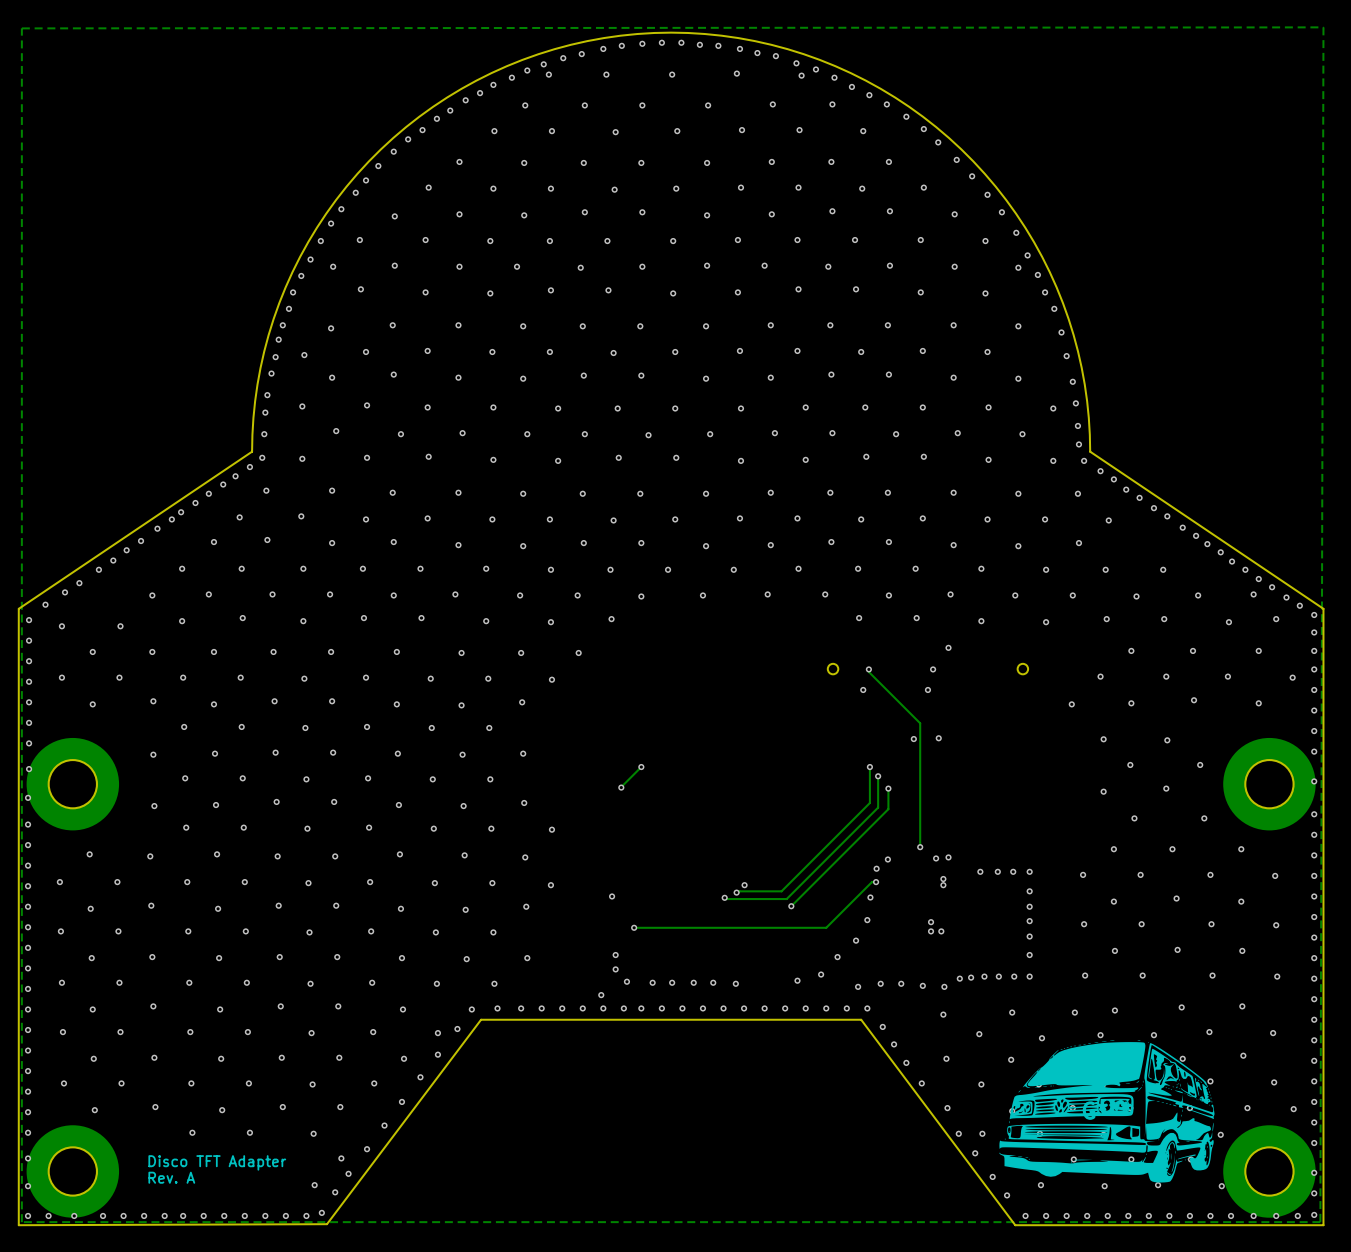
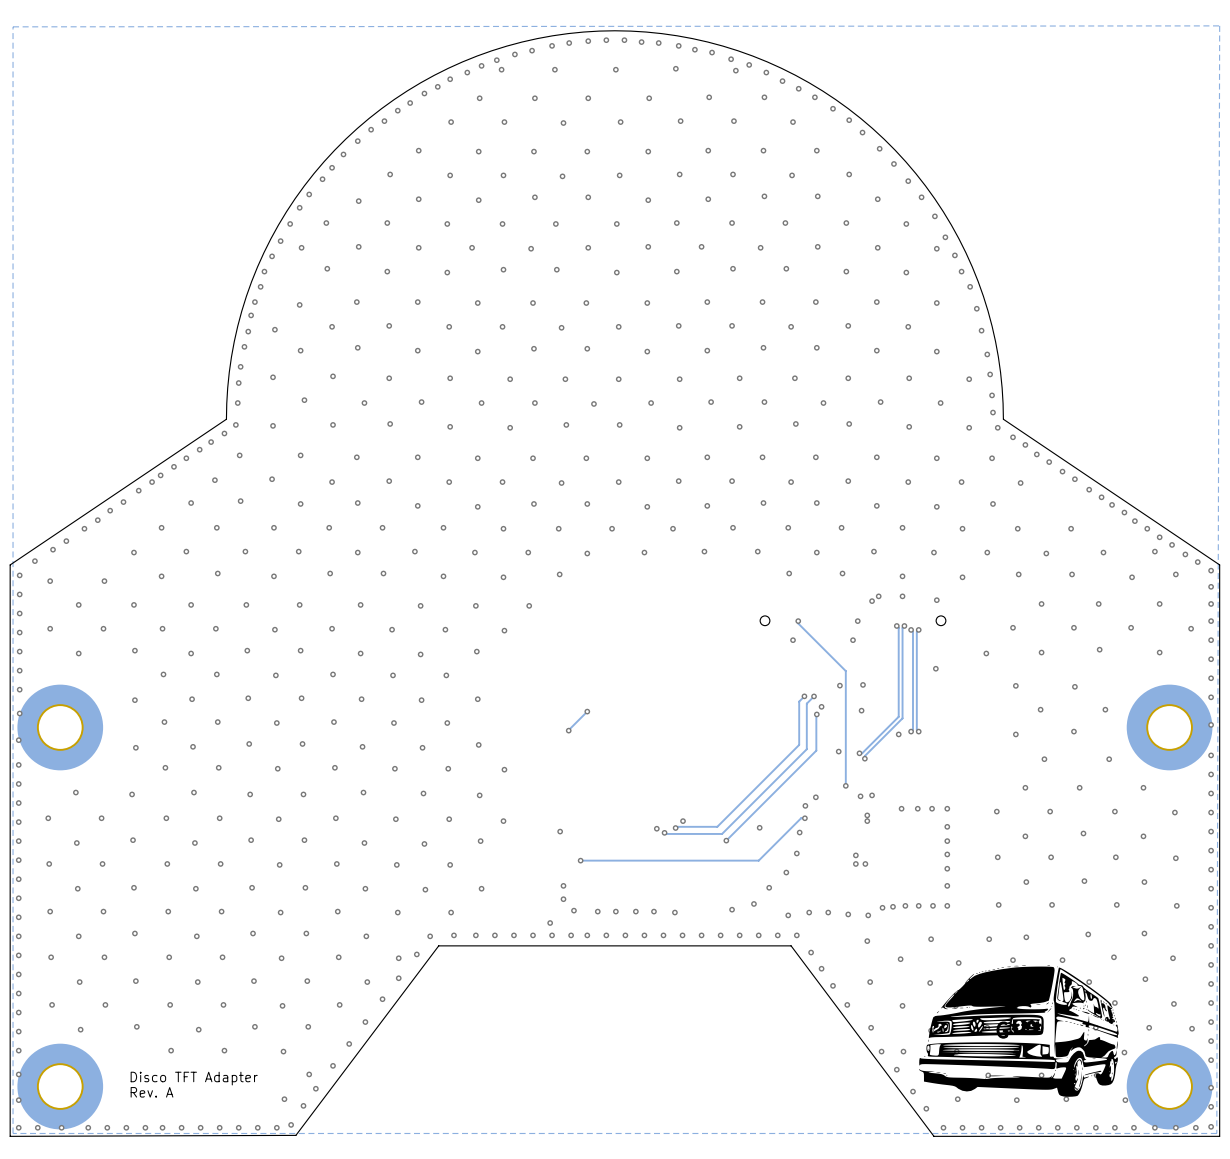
via: none -> (878, 596)
via: none -> (902, 596)
via: none -> (936, 600)
track: none -> (896, 625) (898, 627) (898, 716) (862, 753) (859, 753)
via: none -> (896, 625)
track: none -> (904, 625) (902, 627) (902, 718) (864, 756) (864, 758)
via: none -> (904, 625)
track: none -> (911, 629) (912, 631) (912, 729) (911, 731)
via: none -> (911, 629)
track: none -> (918, 629) (916, 631) (916, 729) (918, 731)
via: none -> (918, 629)
via: none -> (935, 668)
track: none -> (804, 696) (799, 701) (799, 711)
via: none -> (804, 696)
track: none -> (814, 696) (806, 703) (806, 720)
via: none -> (814, 696)
via: none -> (821, 706)
via: none -> (861, 710)
via: (869, 767) -> none
track: none -> (816, 714) (816, 731)
via: none -> (816, 714)
via: (878, 776) -> none
via: (888, 788) -> none
via: none -> (911, 731)
via: none -> (918, 731)
via: none -> (898, 734)
via: none -> (838, 751)
via: none -> (859, 753)
via: none -> (864, 758)
via: none -> (759, 827)
via: none -> (656, 828)

